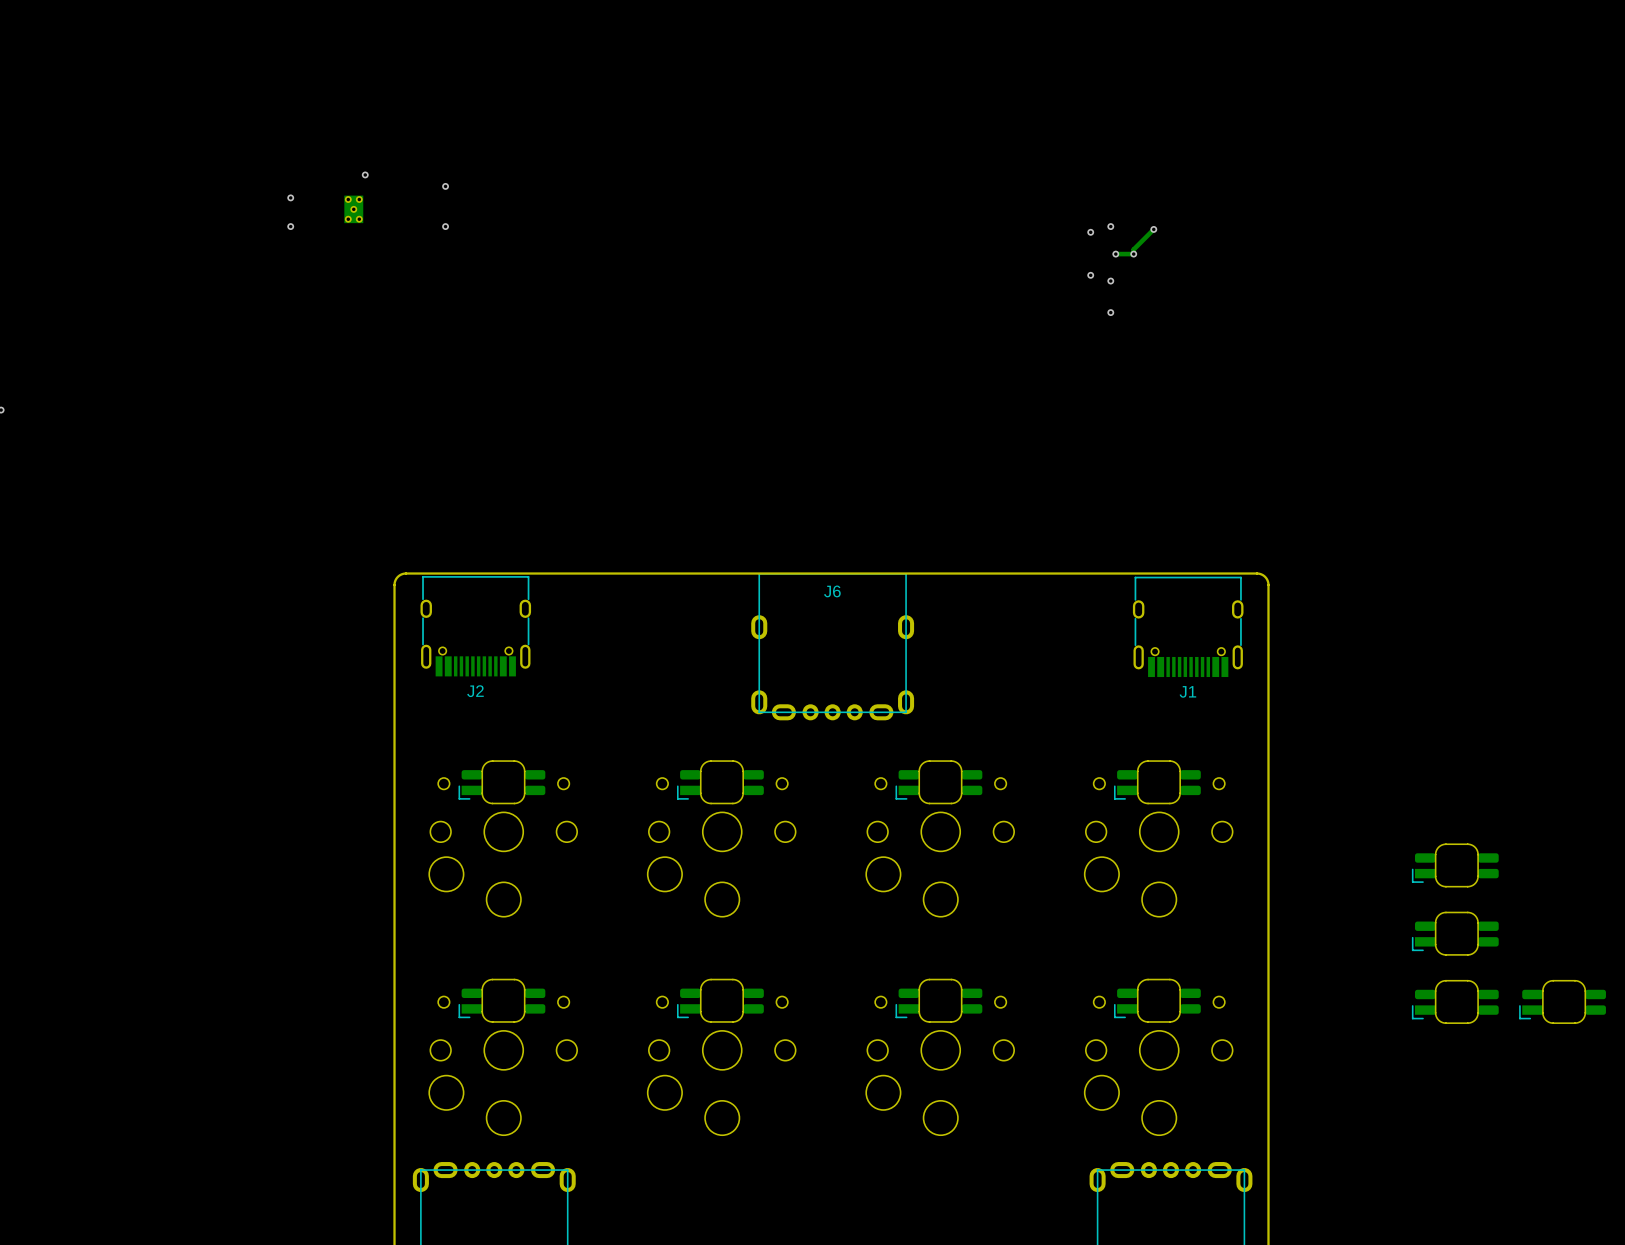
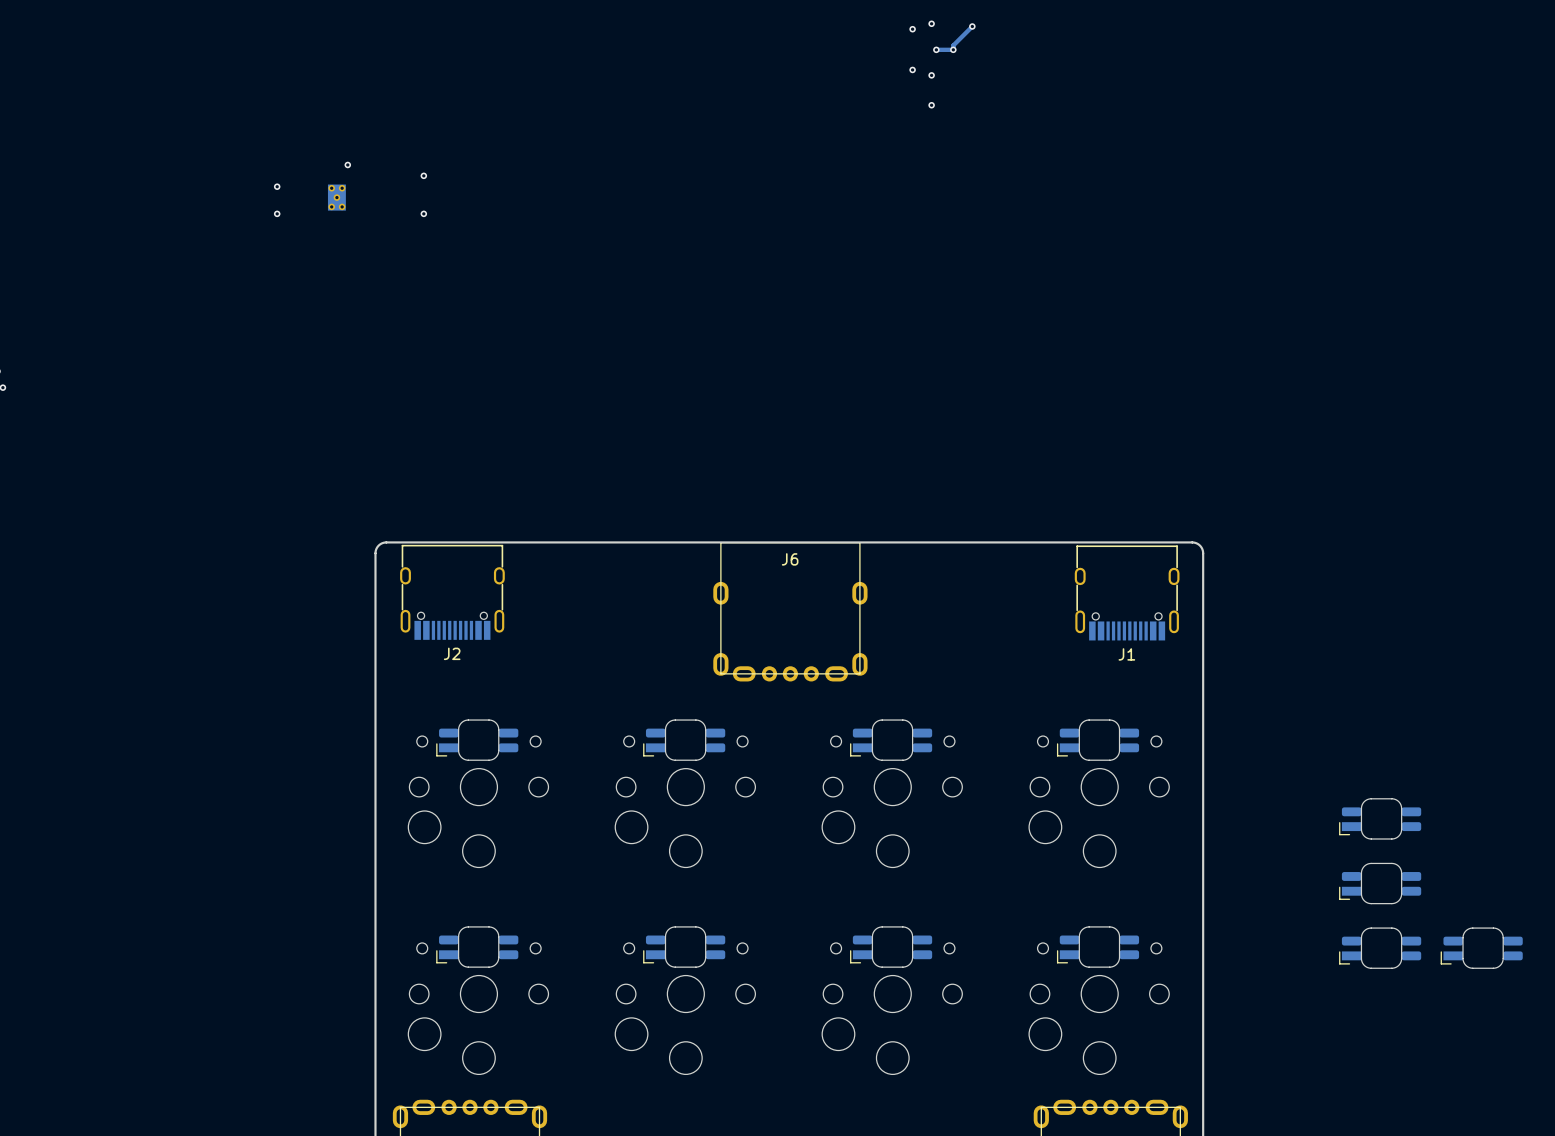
via: none -> (931, 23)
via: none -> (972, 26)
via: none -> (912, 29)
via: none -> (936, 49)
via: none -> (953, 49)
via: none -> (912, 69)
via: none -> (931, 75)
via: none -> (931, 105)
via: (1110, 226) -> none
track: (1153, 229) (1133, 249) (1133, 254) (1115, 254) -> (972, 26) (953, 45) (953, 49) (936, 49)
via: (1153, 229) -> none
via: (1090, 232) -> none
via: (1115, 254) -> none
via: (1133, 254) -> none
via: (1090, 275) -> none
via: (1110, 281) -> none
via: (1110, 312) -> none

